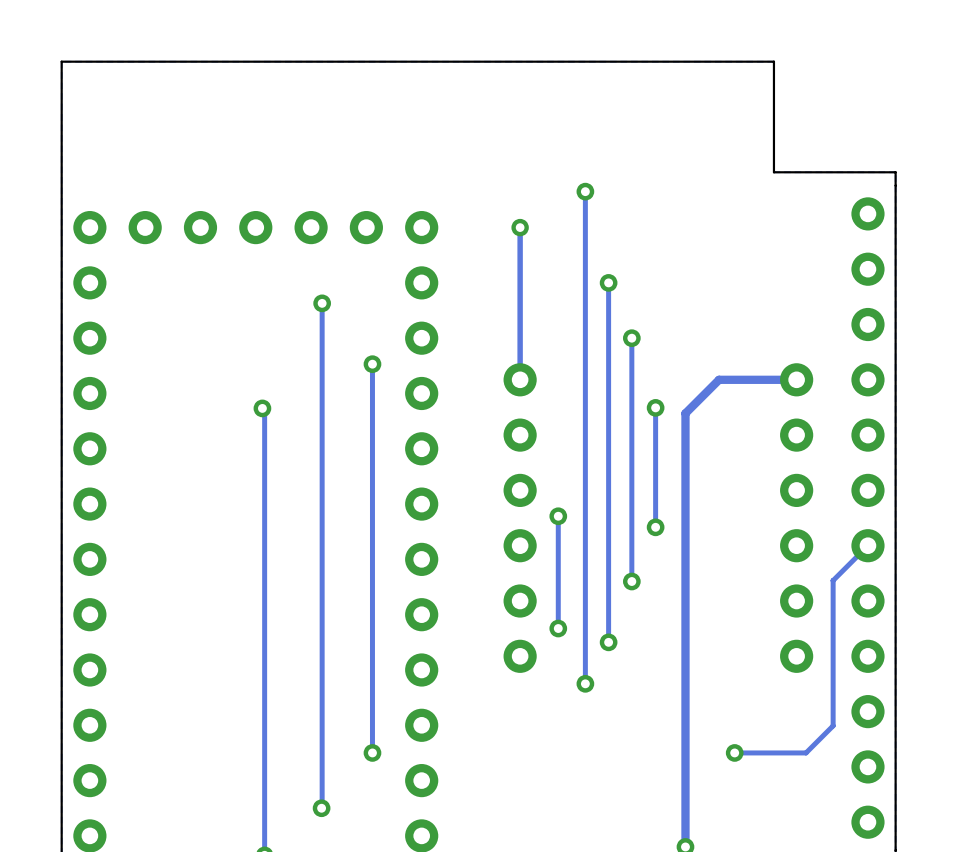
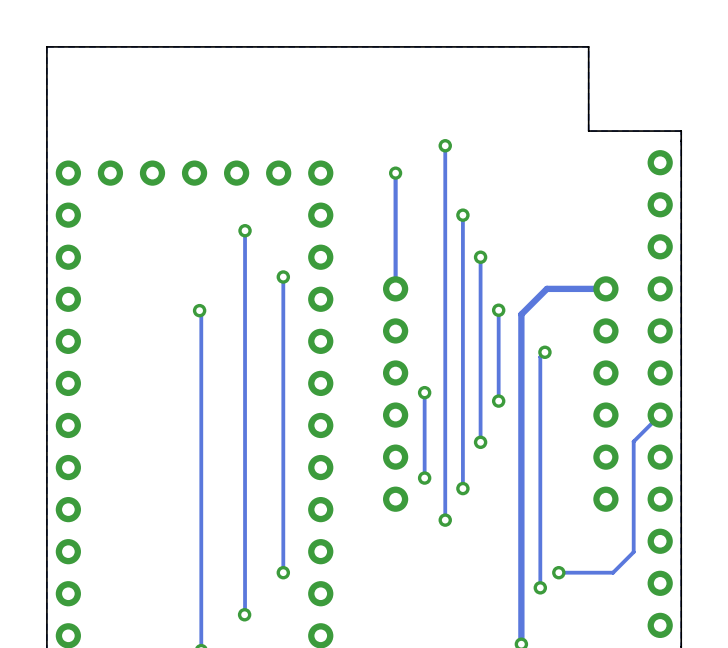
track: none -> (544, 352) (540, 356) (540, 587)
via: none -> (544, 352)
via: none -> (540, 587)

